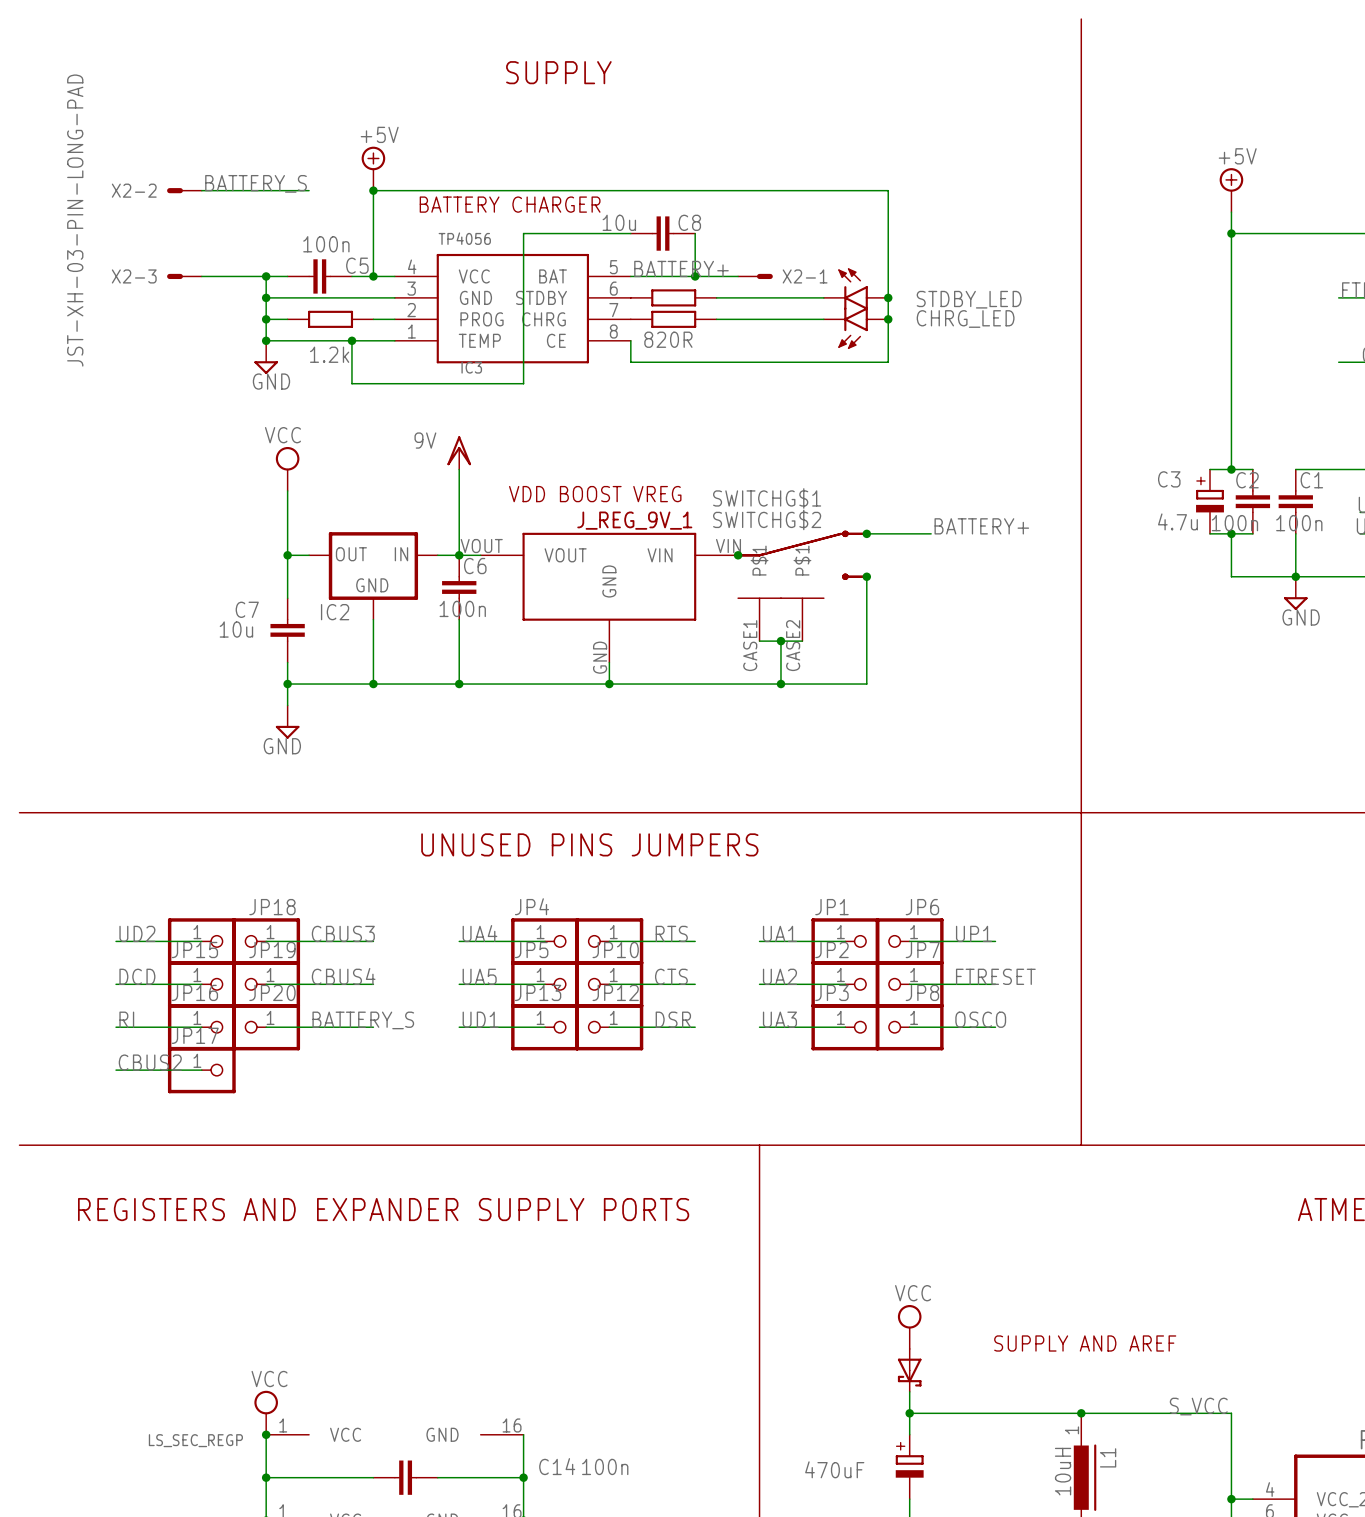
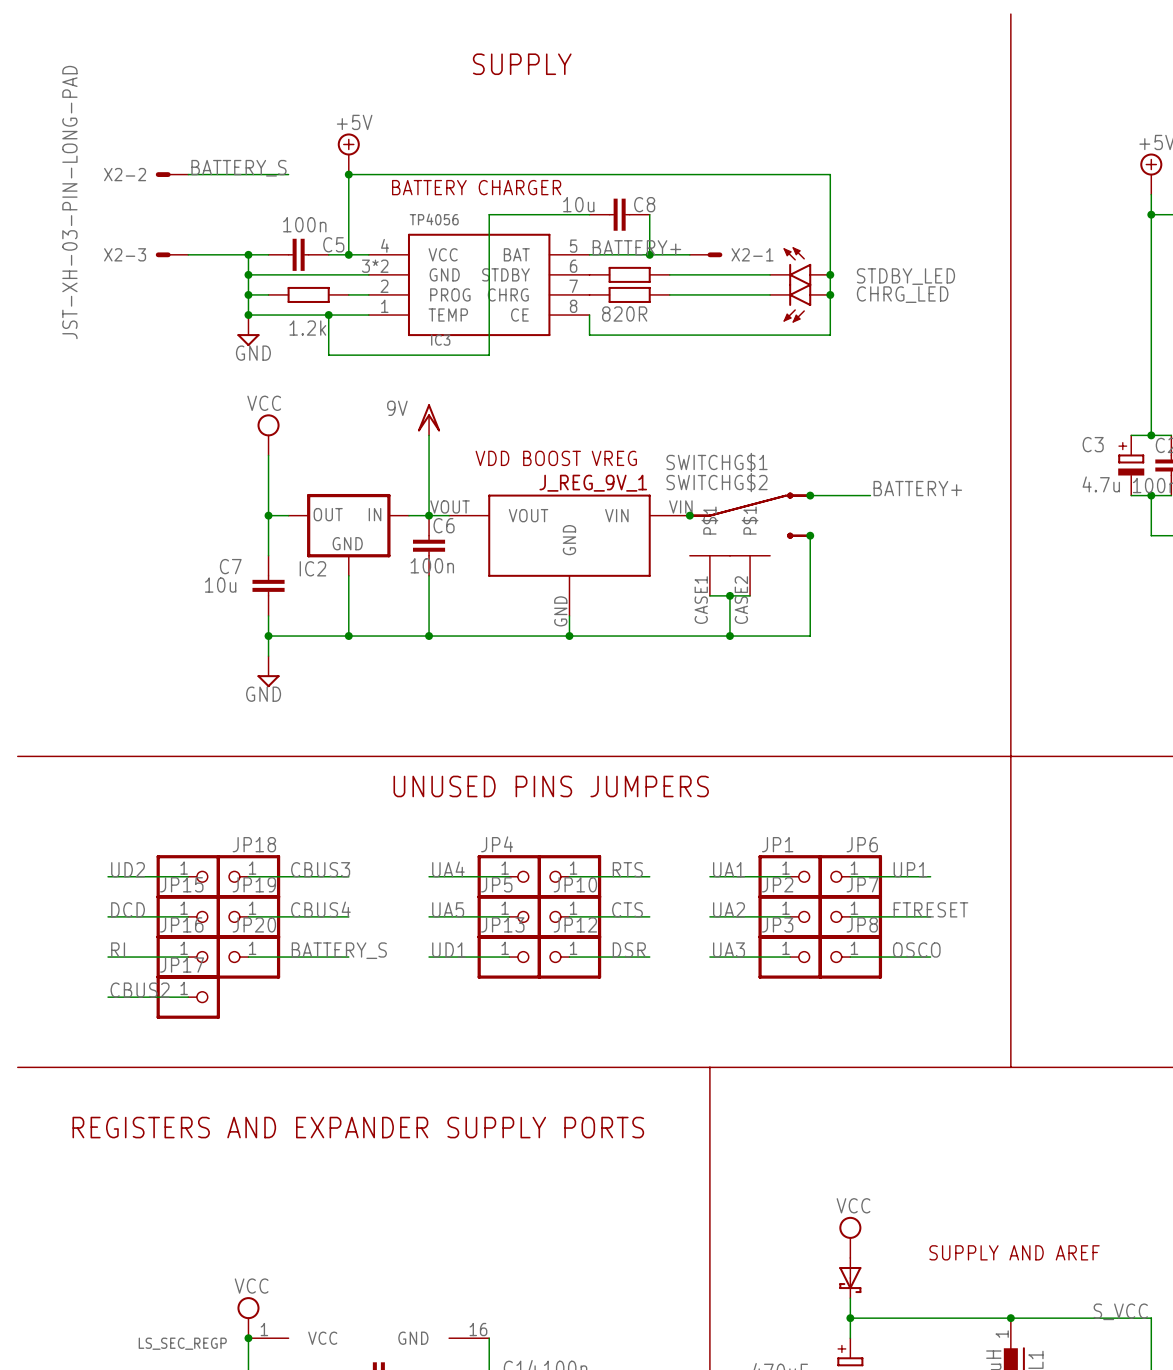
IC3 pin number: 3 (411, 288) -> 3*2 (375, 266)

